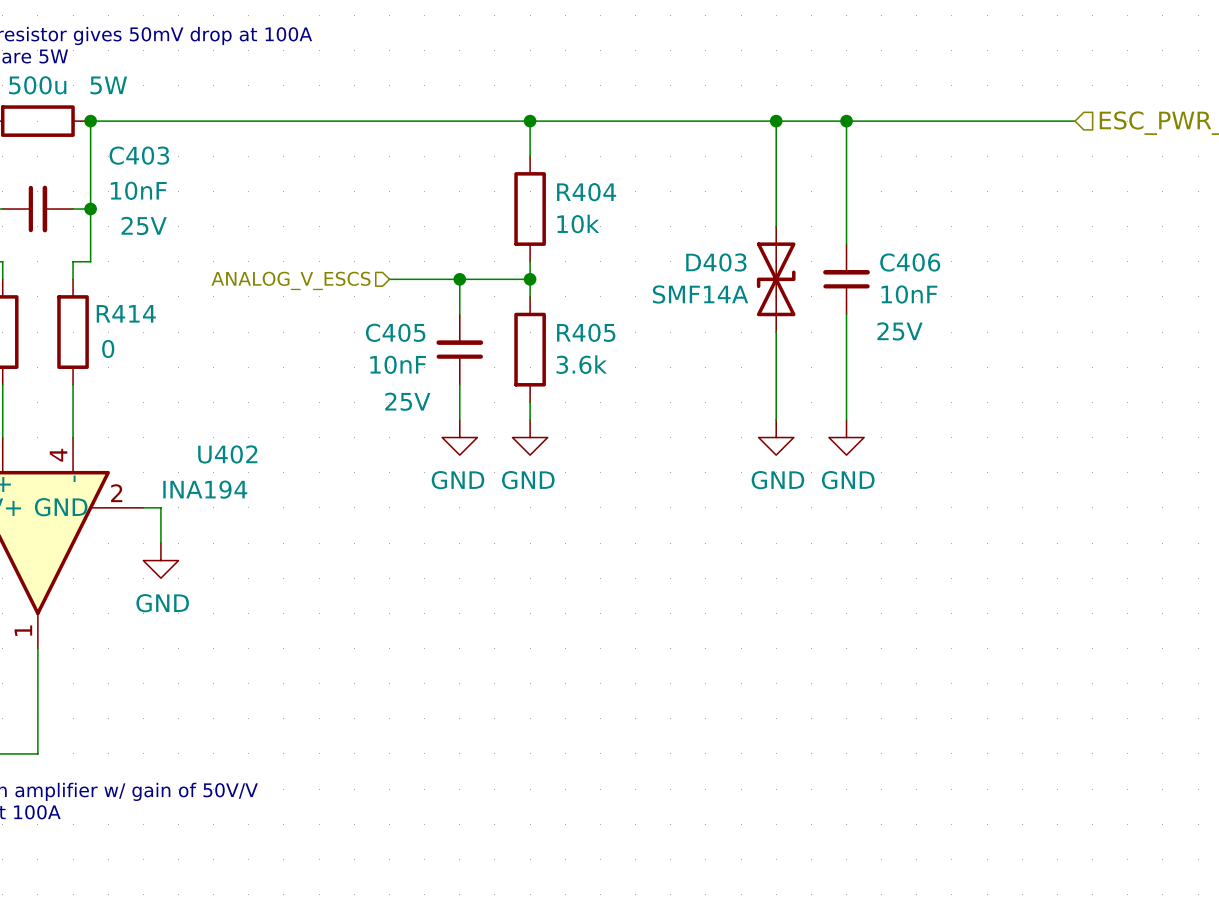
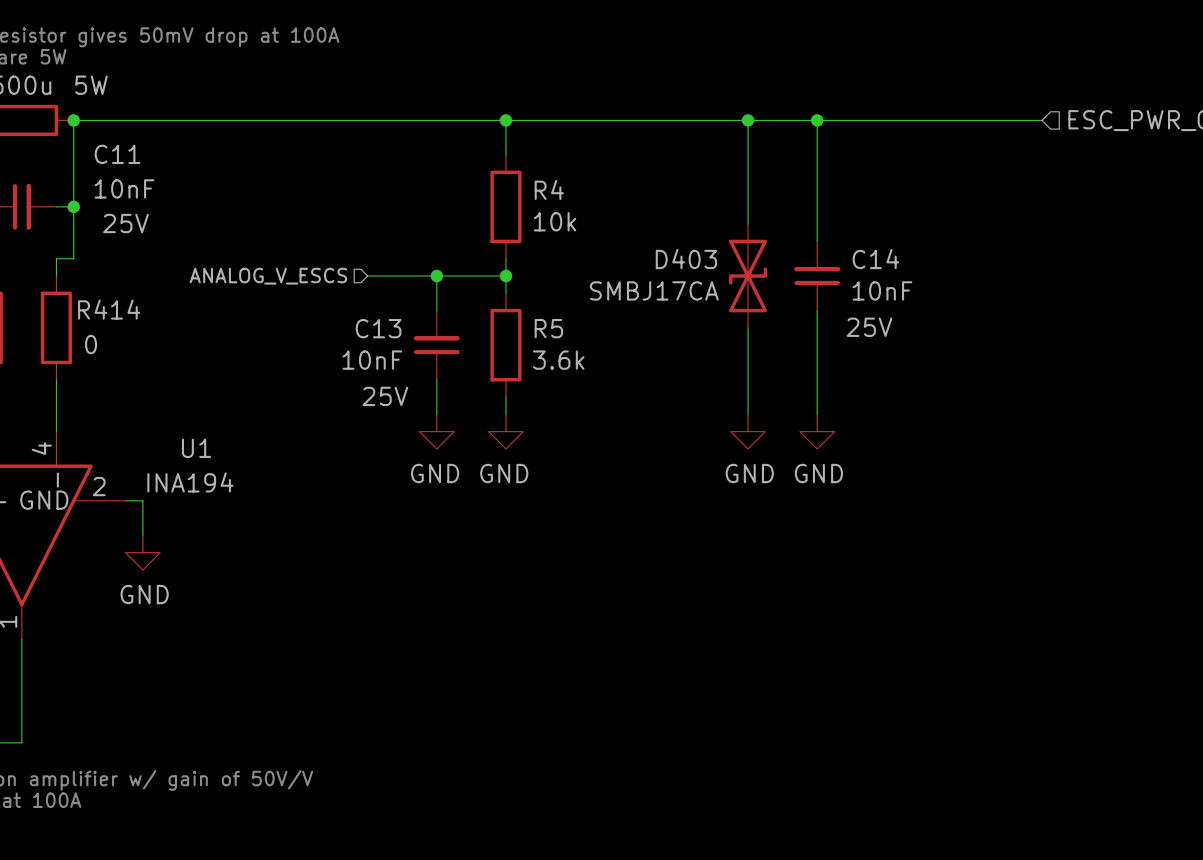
C403 name: C403 (139, 155) -> C11 (117, 154)
R404 name: R404 (586, 192) -> R4 (549, 189)
C406 name: C406 (910, 262) -> C14 (875, 259)
D403 value: SMF14A (700, 294) -> SMBJ17CA (654, 290)
C405 name: C405 (395, 332) -> C13 (378, 328)
R405 name: R405 (586, 332) -> R5 (548, 328)
U402 name: U402 (227, 454) -> U1 (196, 448)

